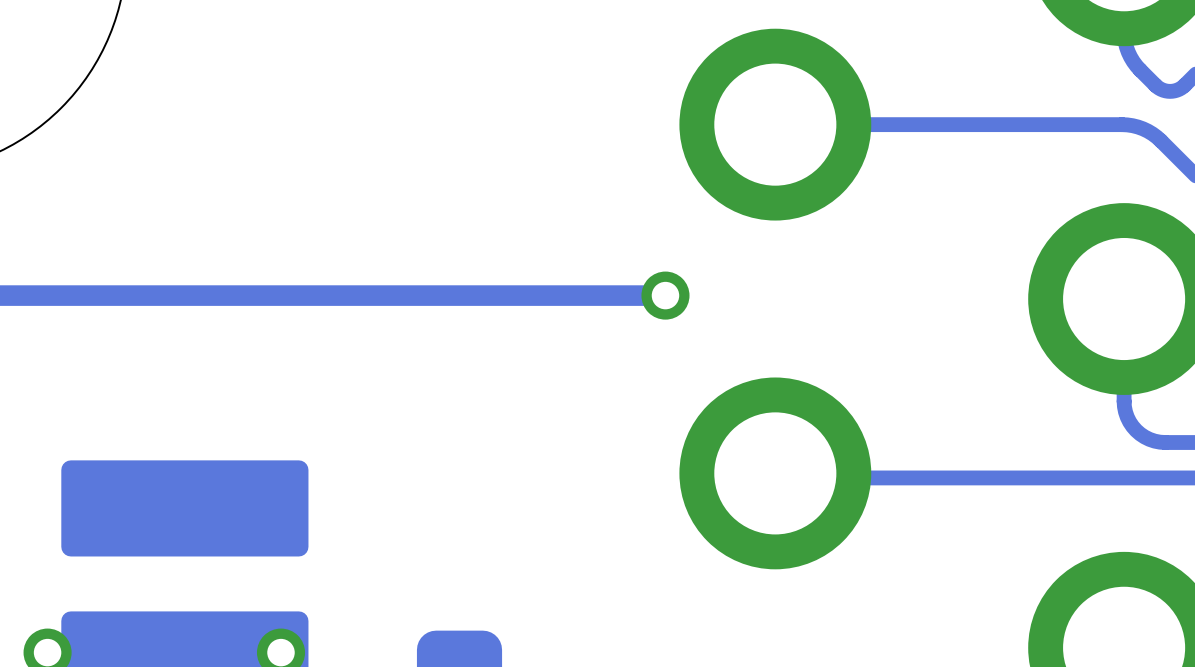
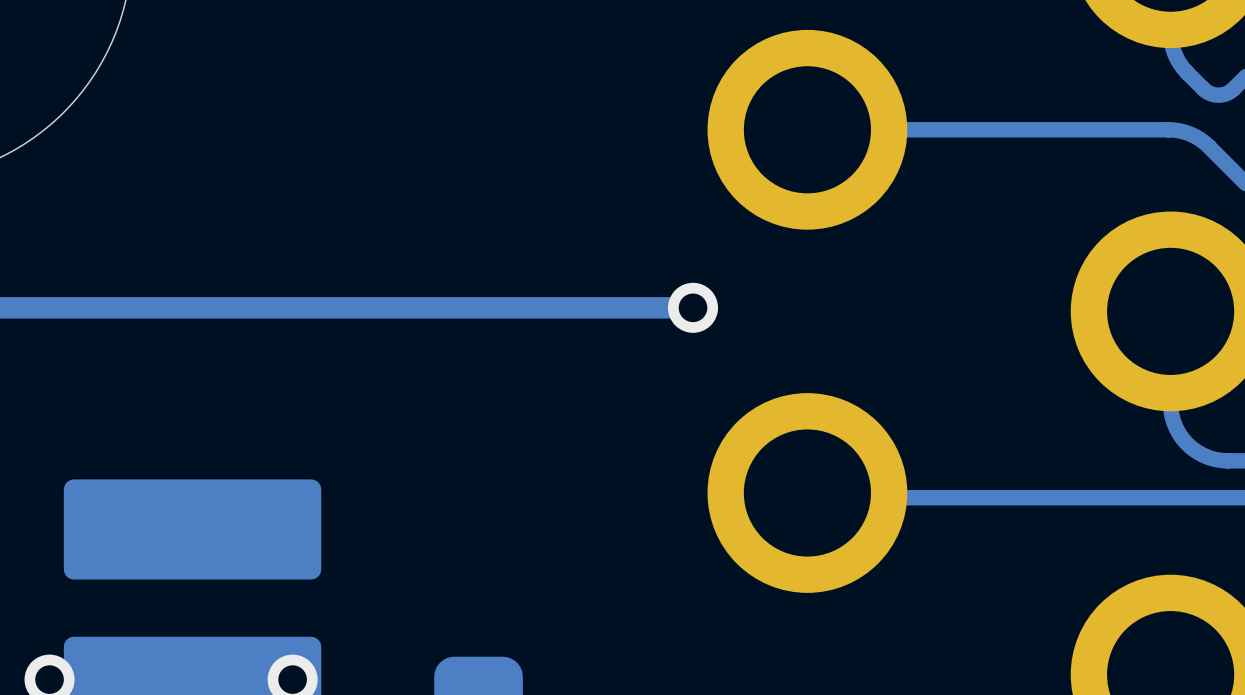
bottom track: (1124, 299) (1124, 401) (1127, 417) (1136, 430) (1149, 439) (1159, 442) (1179, 442) -> (1170, 403) (1176, 428) (1187, 444) (1208, 457) (1227, 460)

